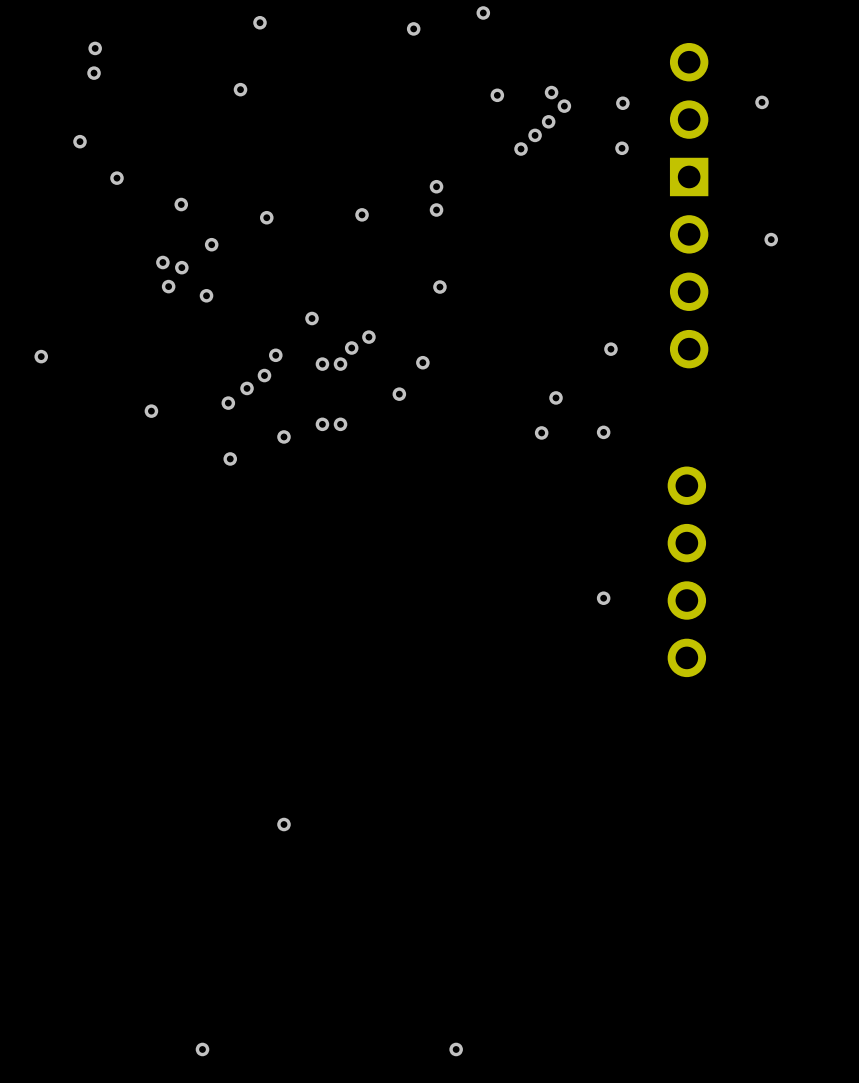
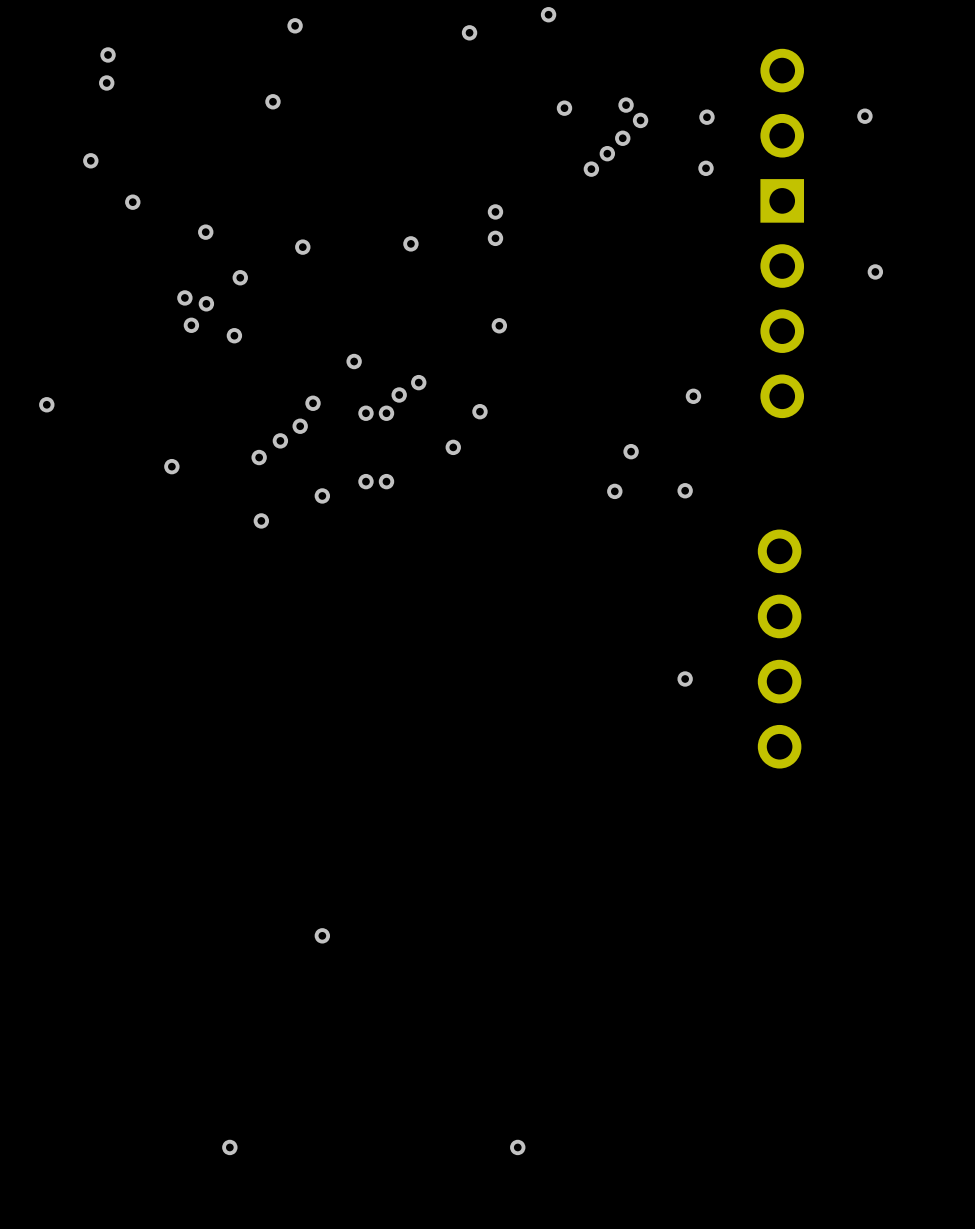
via position: (202, 1049) -> (229, 1147)
via position: (456, 1049) -> (517, 1147)

